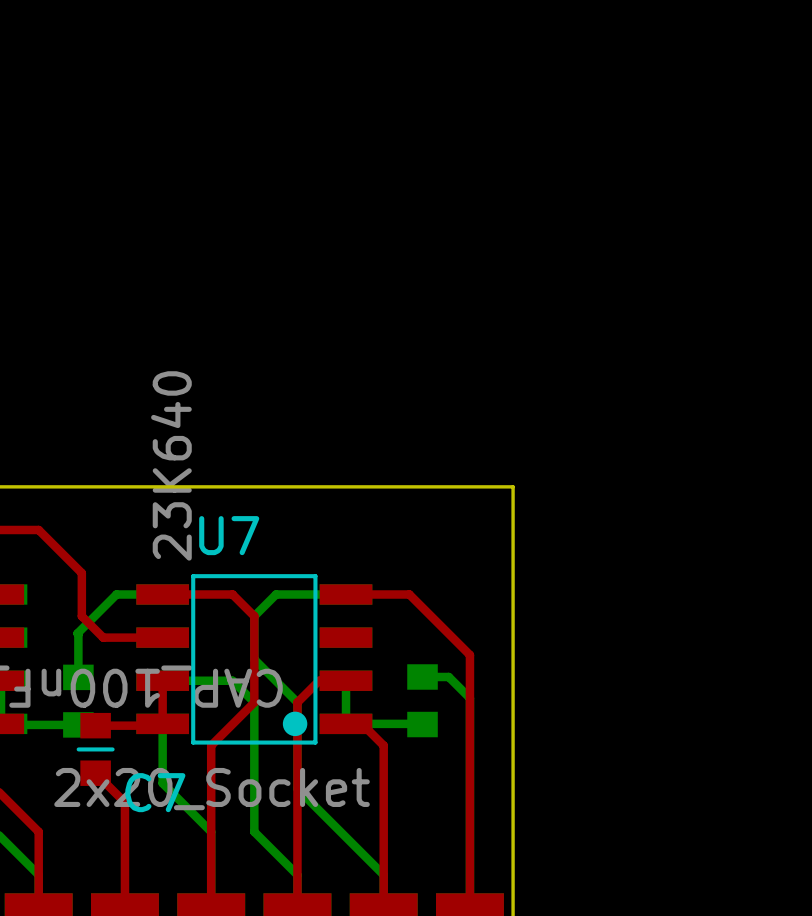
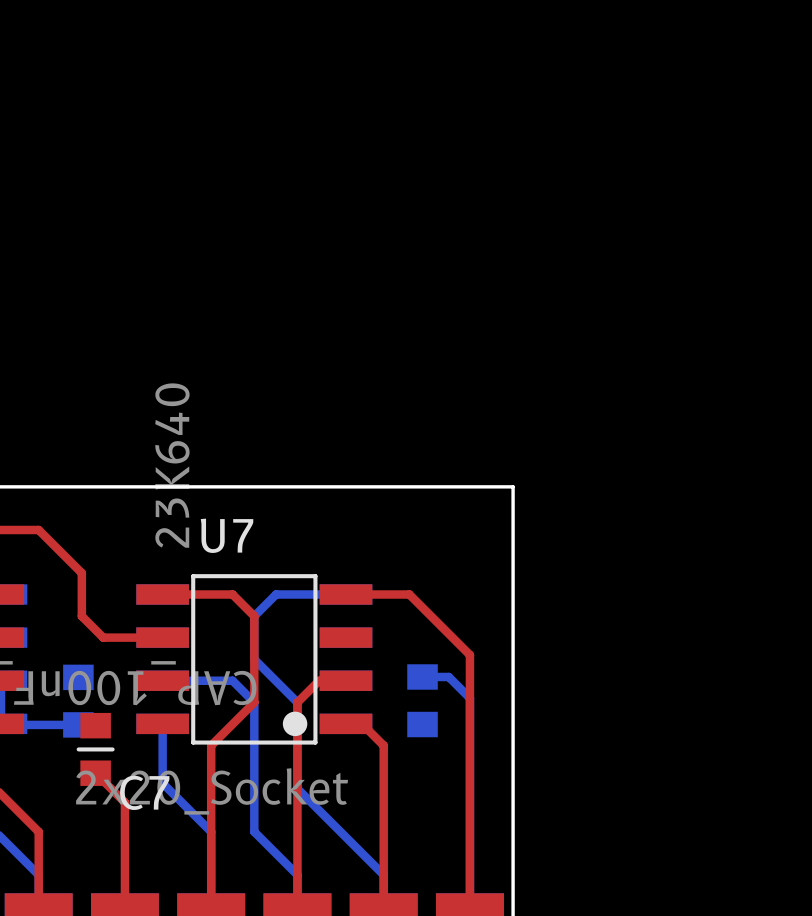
bottom track: (162, 594) (116, 594) (77, 633) (78, 677) -> none
top track: (162, 680) (162, 723) (160, 725) (95, 725) -> none
bottom track: (346, 680) (346, 723) (422, 724) -> none

